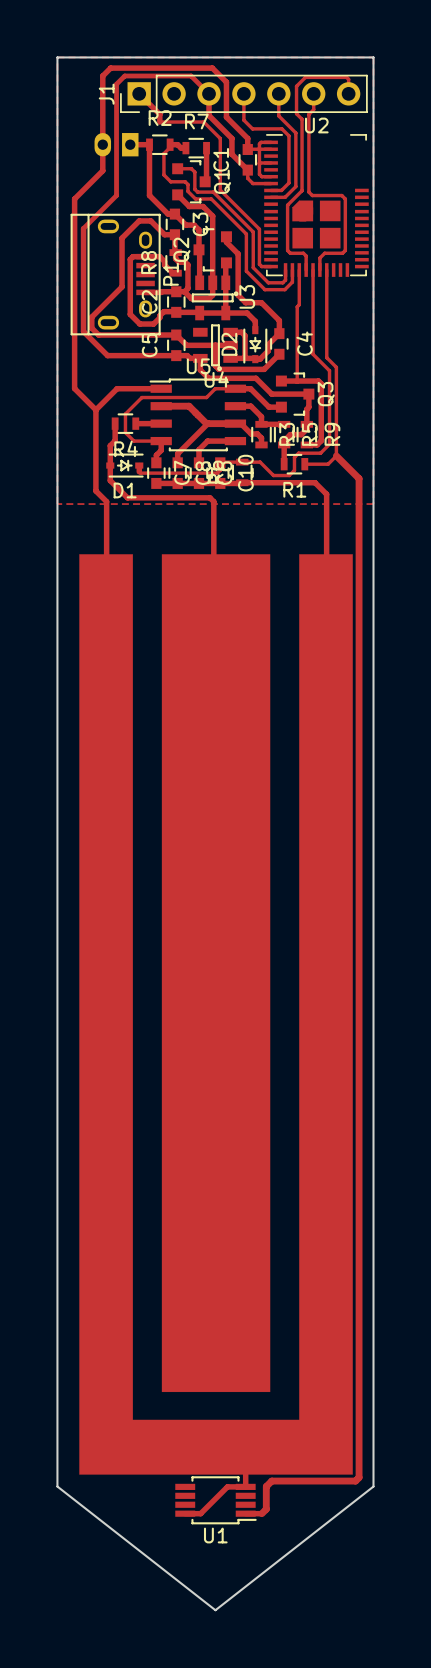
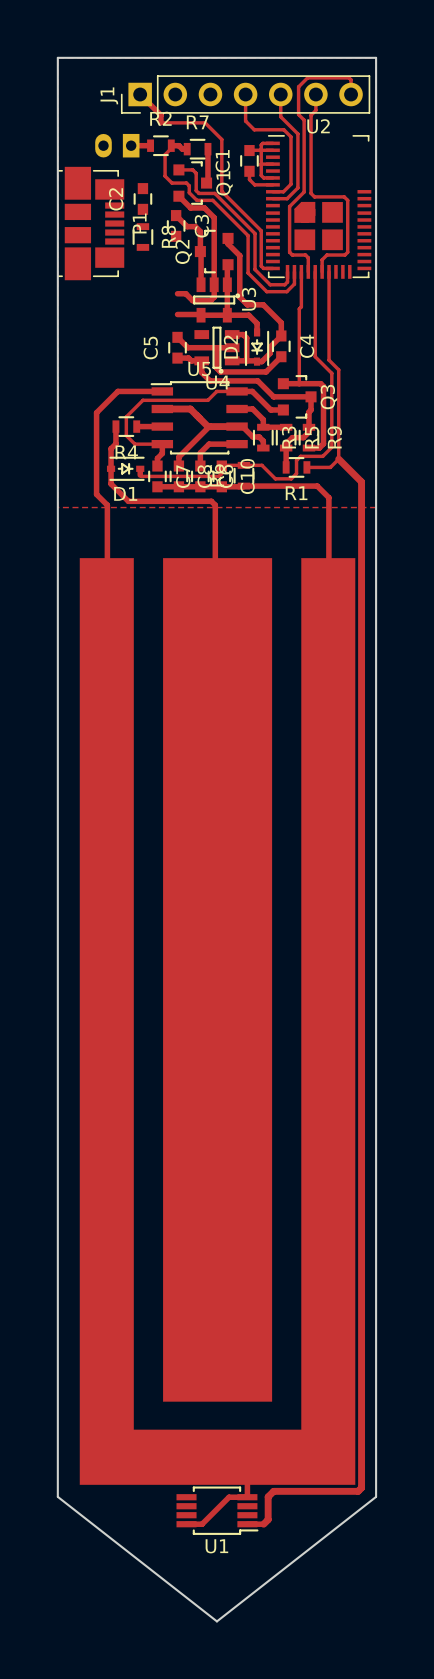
top track: (149, 144) (149, 195) (168, 214) (174, 214) -> none
top track: (247, 149) (247, 138) (226, 117) (226, 82) (212, 68) (110, 68) (102, 75) (102, 170) (74, 198) (74, 388) (95, 409) -> none
top track: (247, 170) (231, 154) (231, 138) (209, 115) (209, 93) (191, 75) (124, 75) (116, 84) (116, 195) (83, 228) (83, 331) (107, 355) (176, 355) -> none
P1 footprint: [70, 213, 161, 336] -> [57, 166, 125, 281]
top track: (175, 252) (174, 234) (164, 234) (150, 220) (139, 220) (122, 238) (122, 286) (91, 317) (91, 328) (98, 335) (176, 335) -> none
top track: (175, 252) (175, 258) (179, 262) (185, 262) (187, 264) (187, 288) (184, 291) -> none
R8 name position: R8 (148, 262) -> R8 (168, 236)
R8 position: (175, 262) -> (142, 237)
top track: (175, 273) (172, 273) (164, 264) (164, 261) (159, 256) (133, 256) (130, 259) (130, 314) (139, 324) (153, 324) (163, 311) (176, 311) -> none
top track: (176, 291) (145, 292) -> none
C2 position: (176, 302) -> (142, 198)

